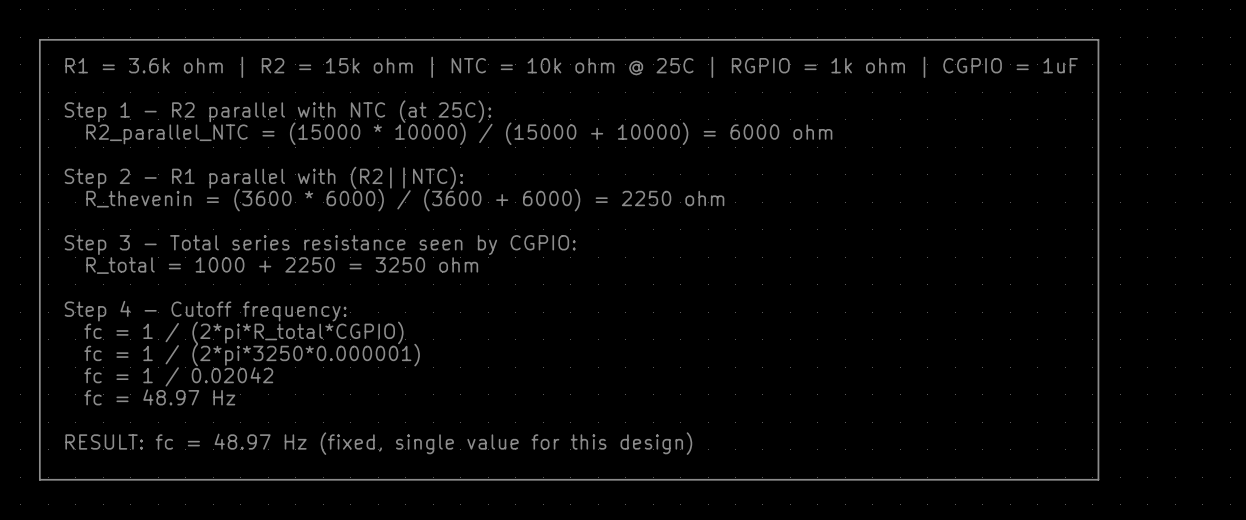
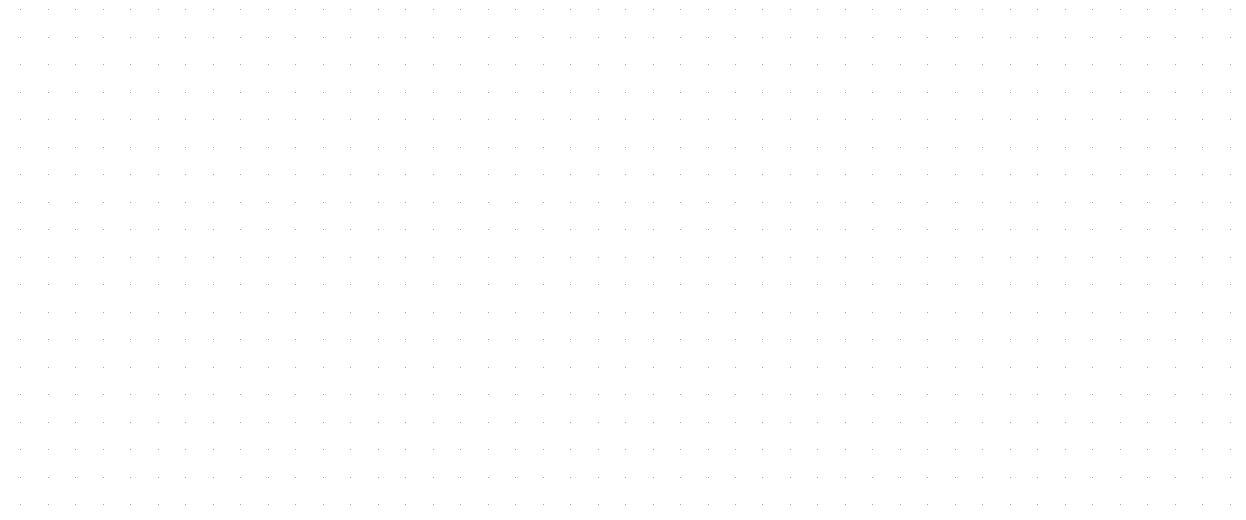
line: (39, 39) (1098, 39) (1098, 479) (39, 479) (39, 39) -> none
text: R1 = 3.6k ohm | R2 = 15k ohm | NTC = 10k ohm @ 25C | RGPIO = 1k ohm | CGPIO = 1uF (571, 67) -> none
text: Step 1 - R2 parallel with NTC (at 25C): (277, 111) -> none
text: R2_parallel_NTC = (15000 * 10000) / (15000 + 10000) = 6000 ohm (459, 133) -> none
text: Step 2 - R1 parallel with (R2||NTC): (263, 178) -> none
text: R_thevenin = (3600 * 6000) / (3600 + 6000) = 2250 ohm (405, 200) -> none
text: Step 3 - Total series resistance seen by CGPIO: (320, 245) -> none
text: R_total = 1000 + 2250 = 3250 ohm (282, 265) -> none
text: Step 4 - Cutoff frequency: (205, 311) -> none
text: fc = 1 / (2*pi*R_total*CGPIO) (243, 332) -> none
text: fc = 1 / (2*pi*3250*0.000001) (252, 355) -> none
text: fc = 1 / 0.02042 (178, 376) -> none
text: fc = 48.97 Hz (159, 397) -> none
text: RESULT: fc = 48.97 Hz (fixed, single value for this design) (378, 443) -> none

